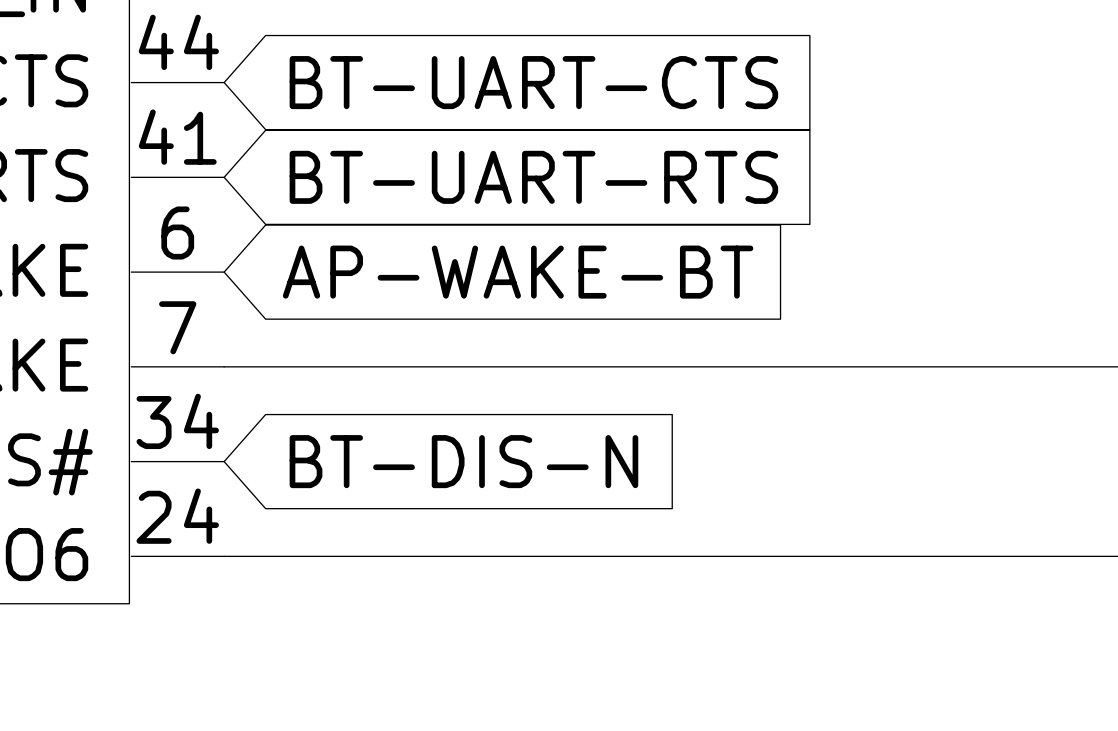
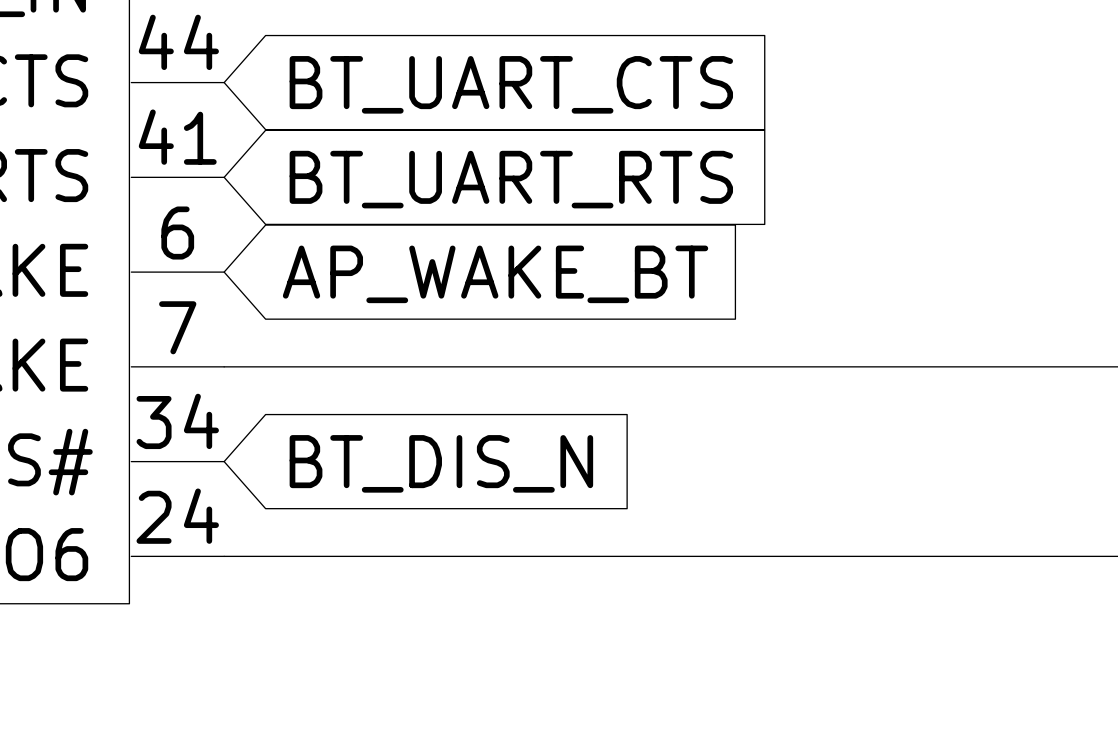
global label: BT-UART-CTS (533, 82) -> BT_UART_CTS (511, 84)
global label: BT-UART-RTS (533, 177) -> BT_UART_RTS (511, 179)
global label: AP-WAKE-BT (518, 272) -> AP_WAKE_BT (495, 274)
global label: BT-DIS-N (463, 461) -> BT_DIS_N (441, 463)

